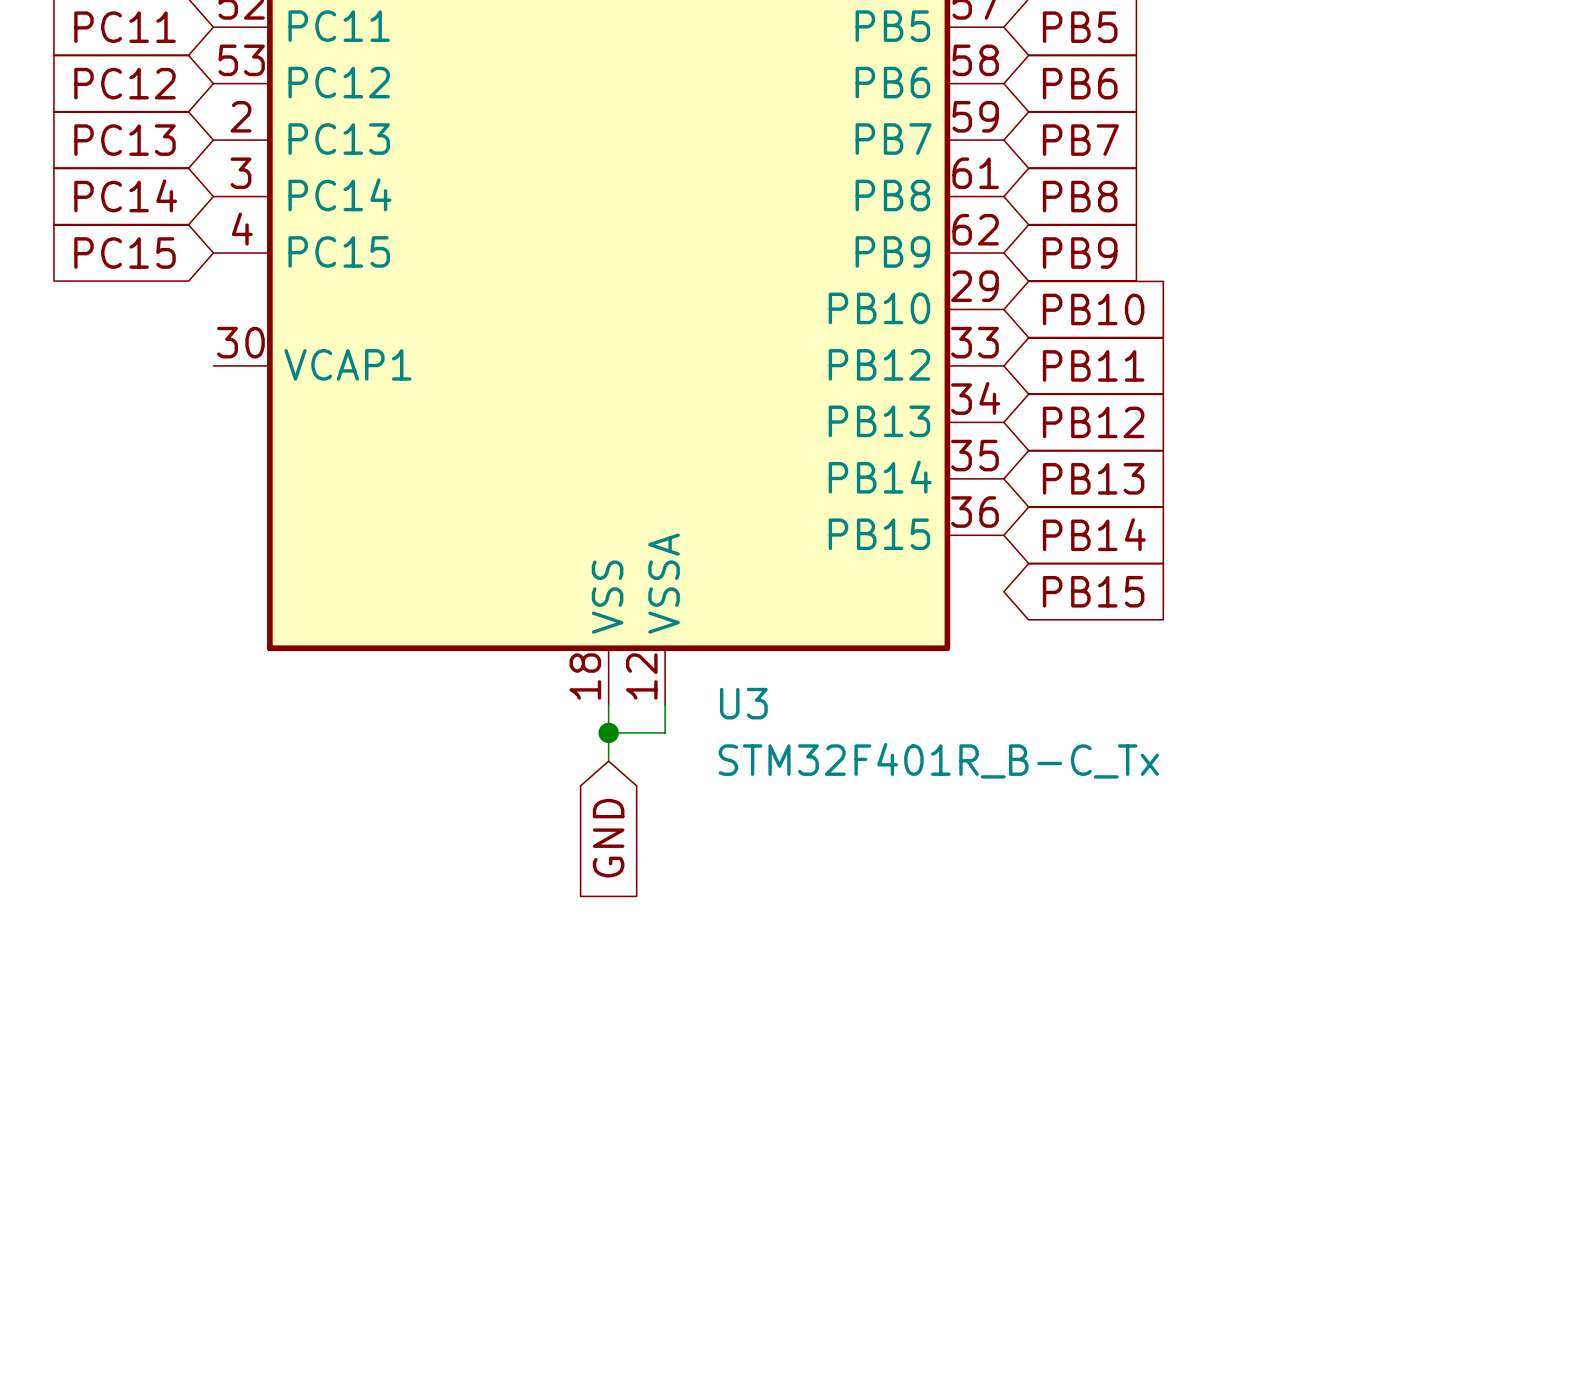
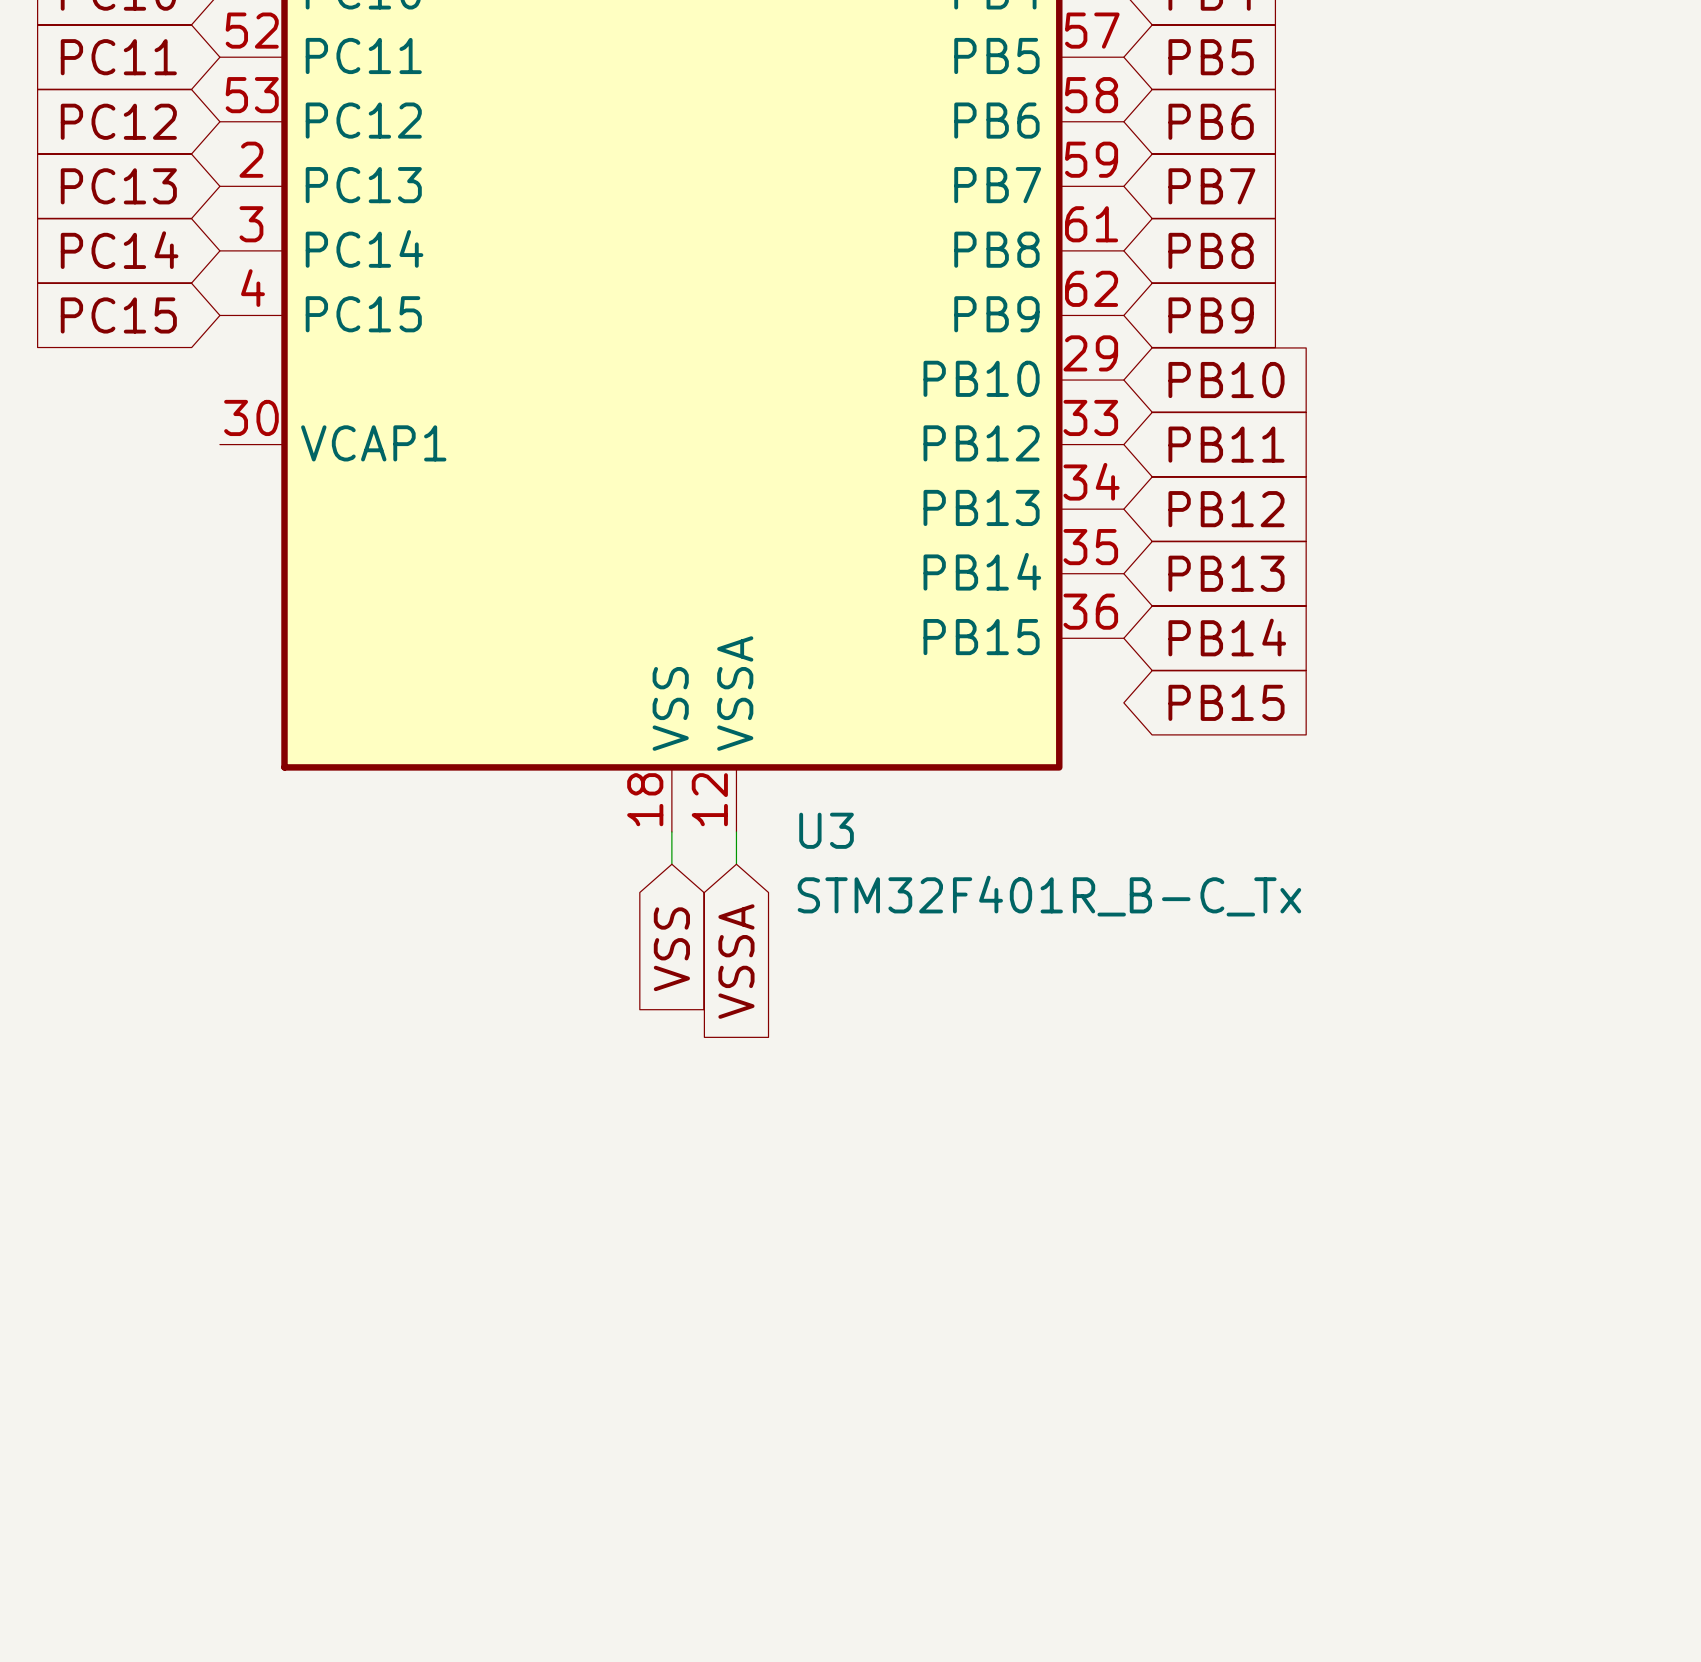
junction: (608, 732) -> none
wire: (665, 732) (608, 732) (608, 761) -> none
global label: none -> VSS (671, 949)
global label: none -> VSSA (736, 961)
global label: GND (608, 838) -> none

